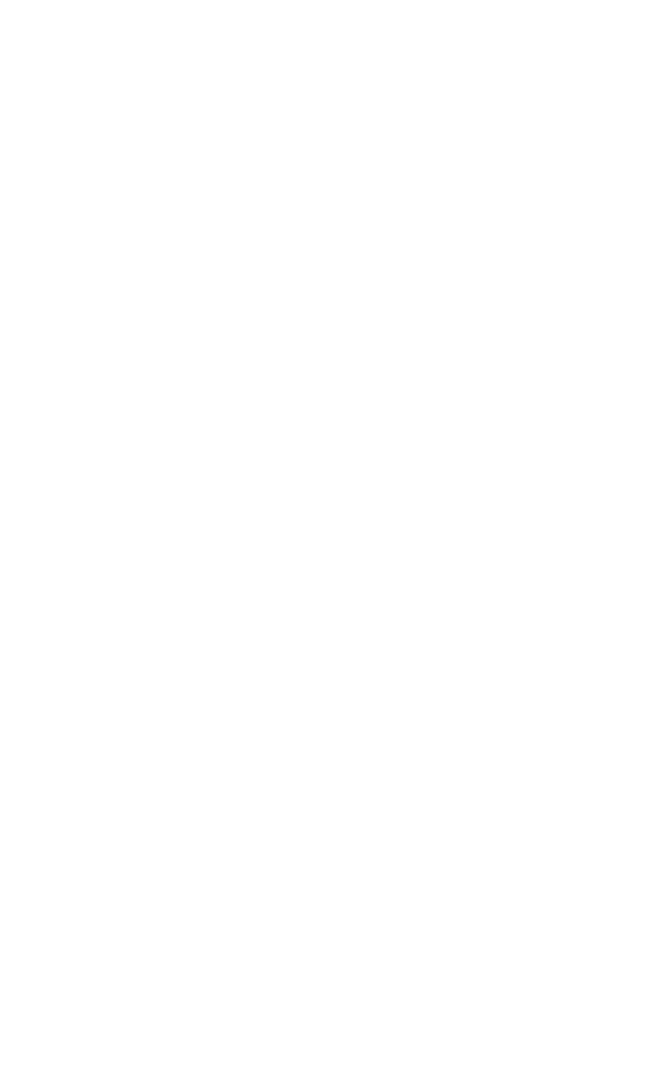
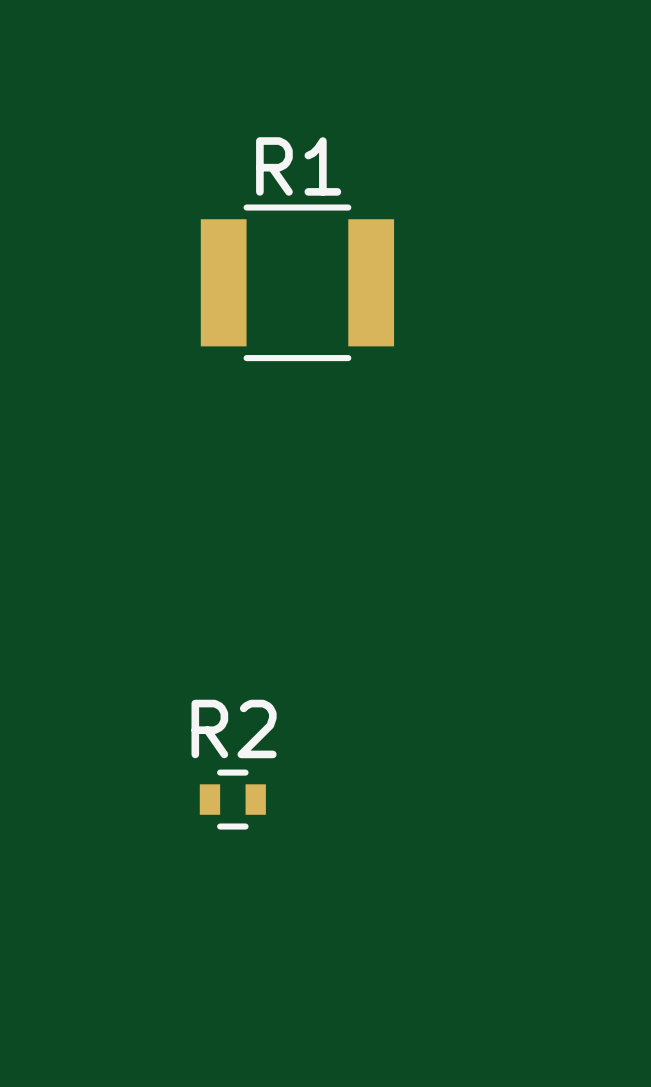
R1: none -> (297, 282)
R2: none -> (232, 799)

